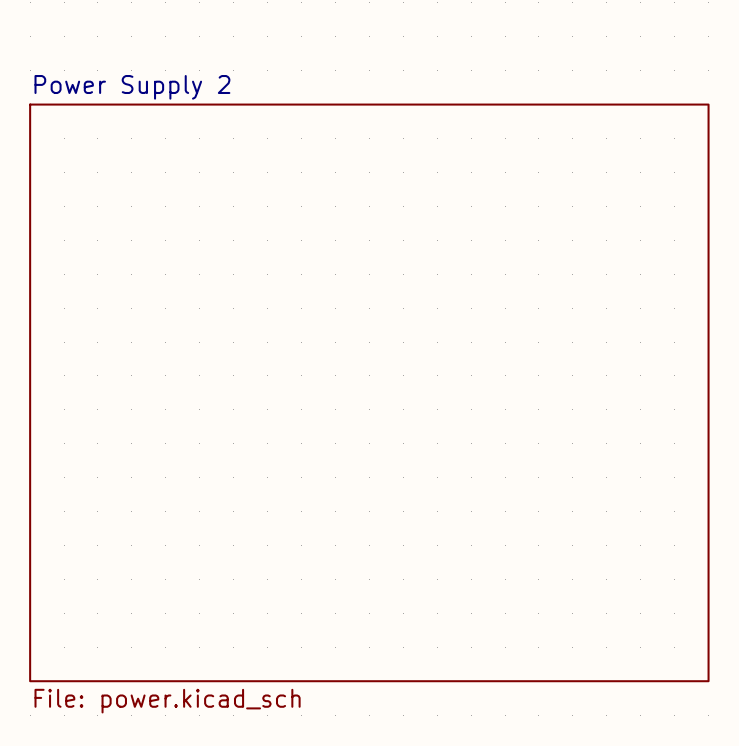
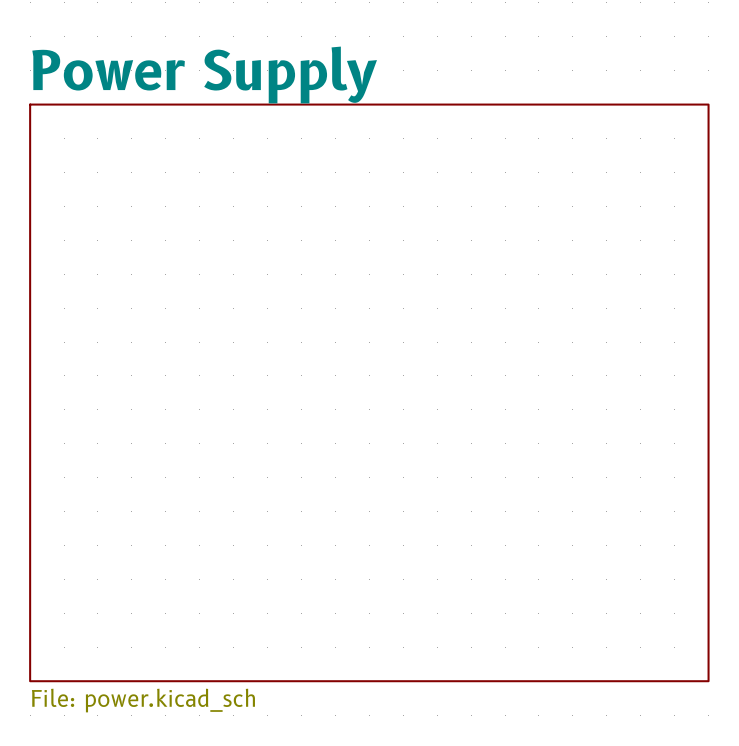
sheet Power Supply 2 name: Power Supply 2 (132, 87) -> Power Supply (204, 75)

